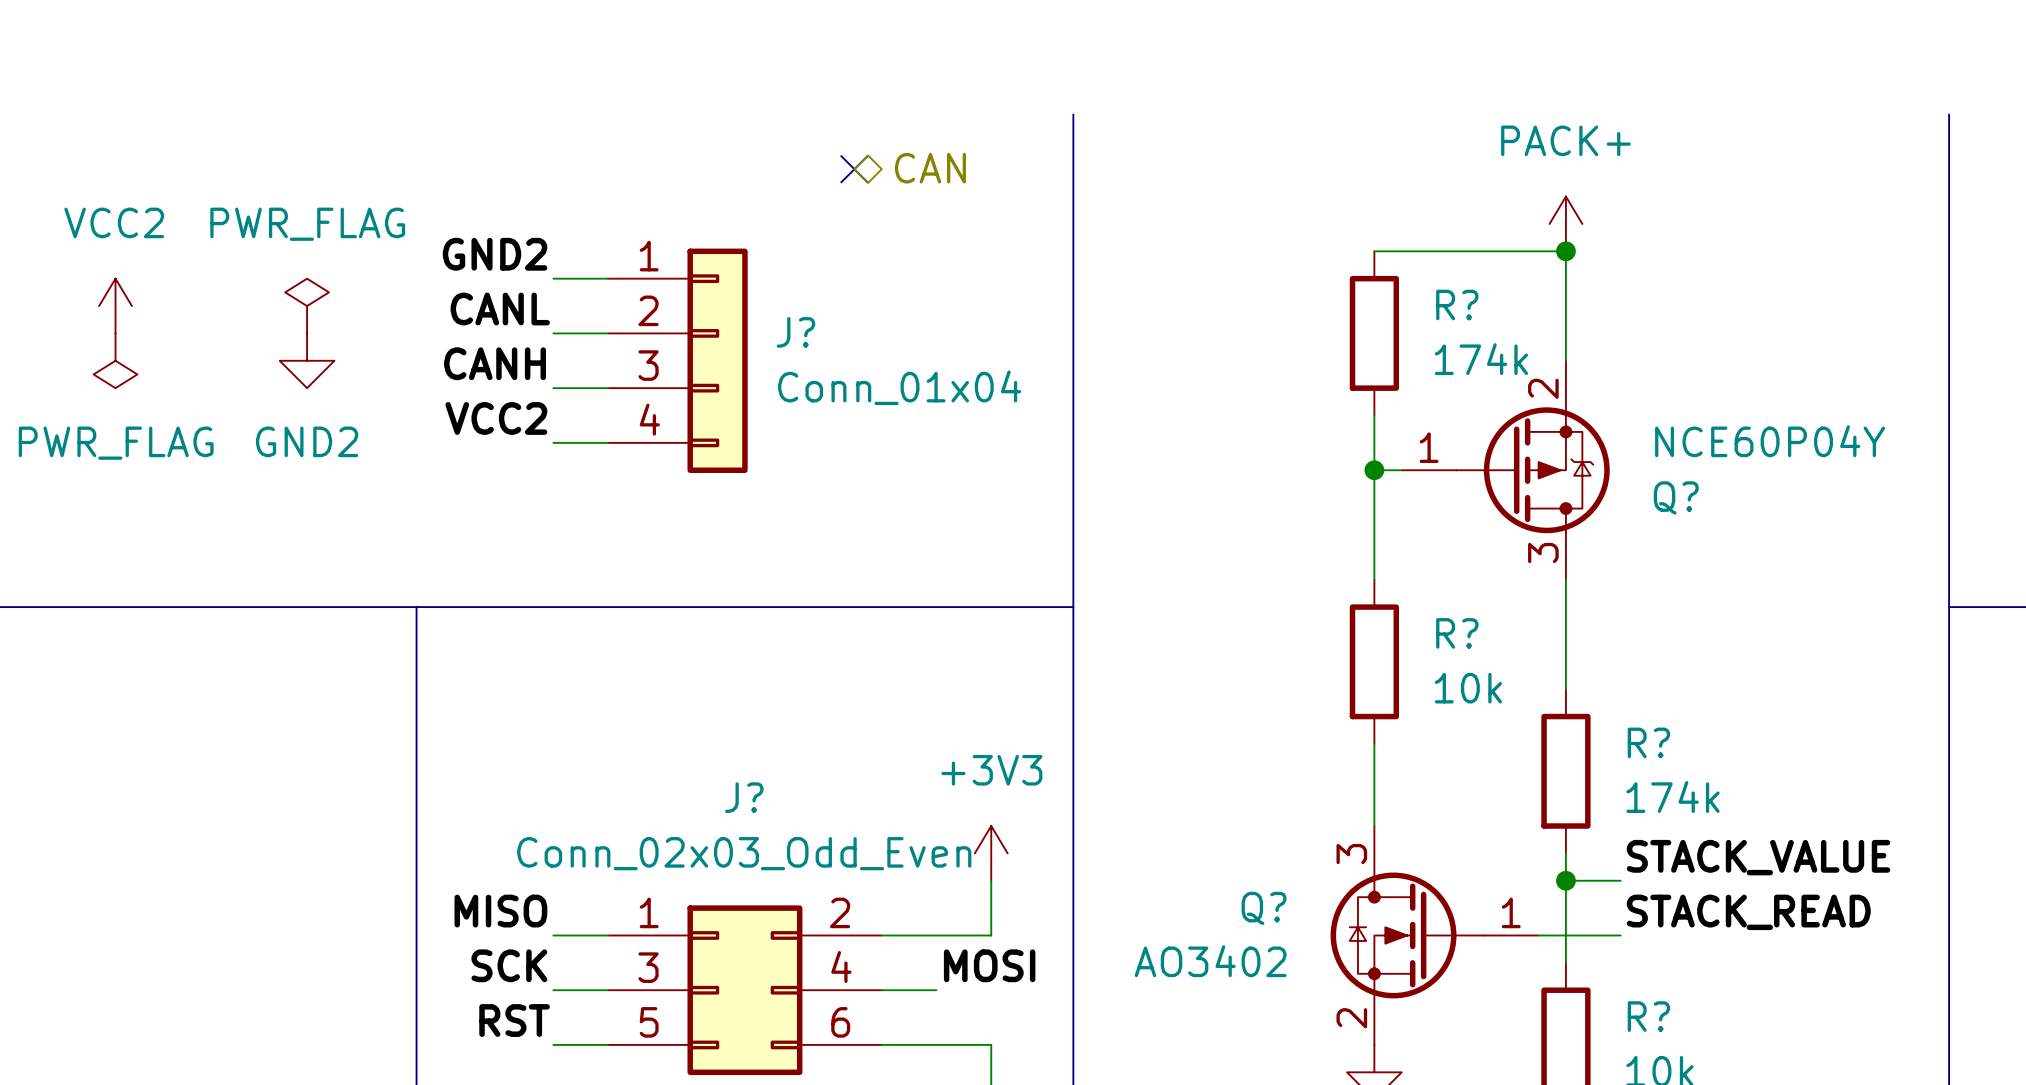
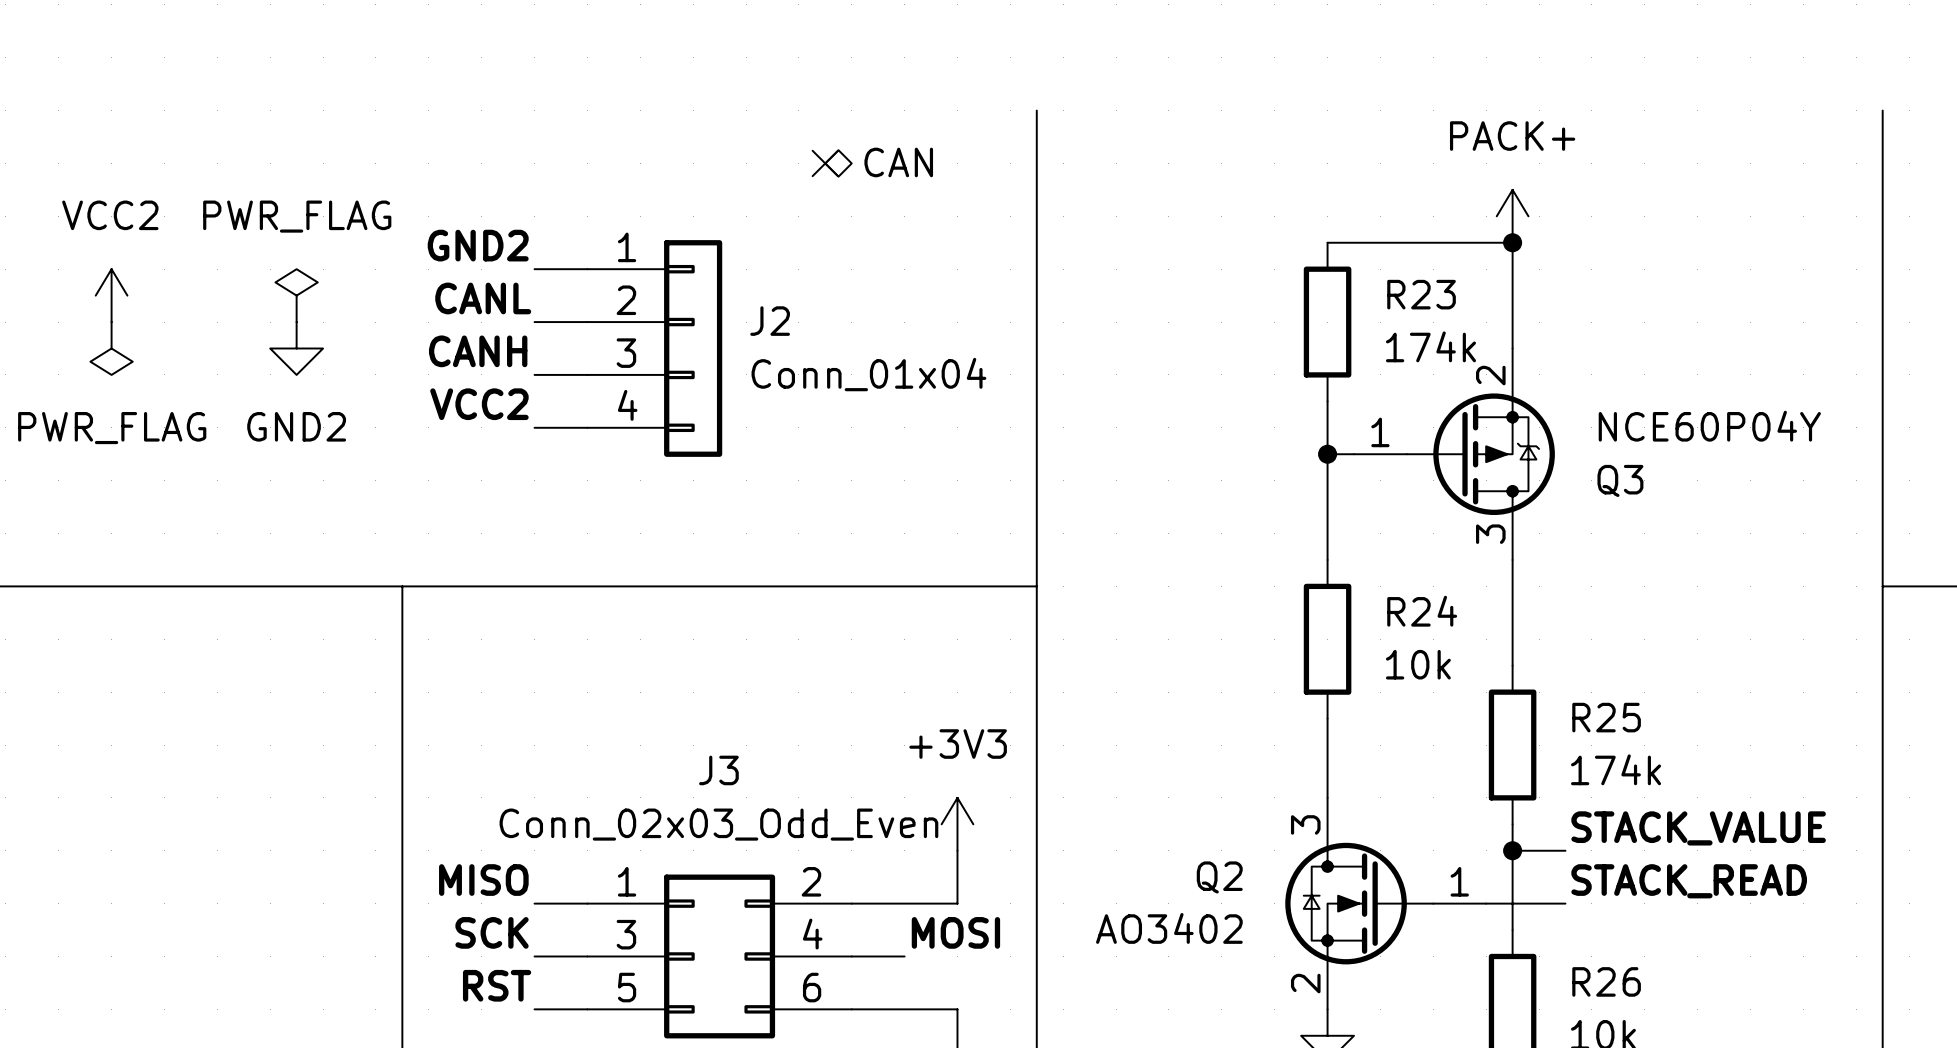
R? name: R? (1457, 305) -> R23 (1421, 294)
J? name: J? (795, 332) -> J2 (770, 321)
Q? name: Q? (1676, 497) -> Q3 (1620, 480)
R? name: R? (1457, 633) -> R24 (1422, 611)
R? name: R? (1648, 742) -> R25 (1606, 717)
J? name: J? (744, 797) -> J3 (718, 770)
Q? name: Q? (1264, 908) -> Q2 (1219, 877)
R? name: R? (1648, 1016) -> R26 (1606, 981)

